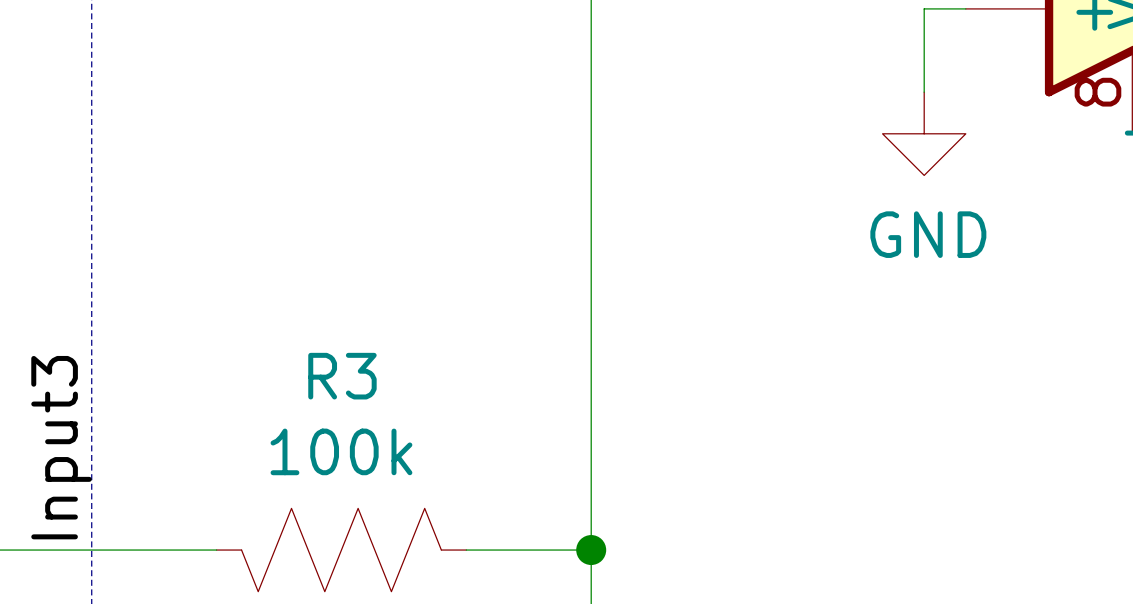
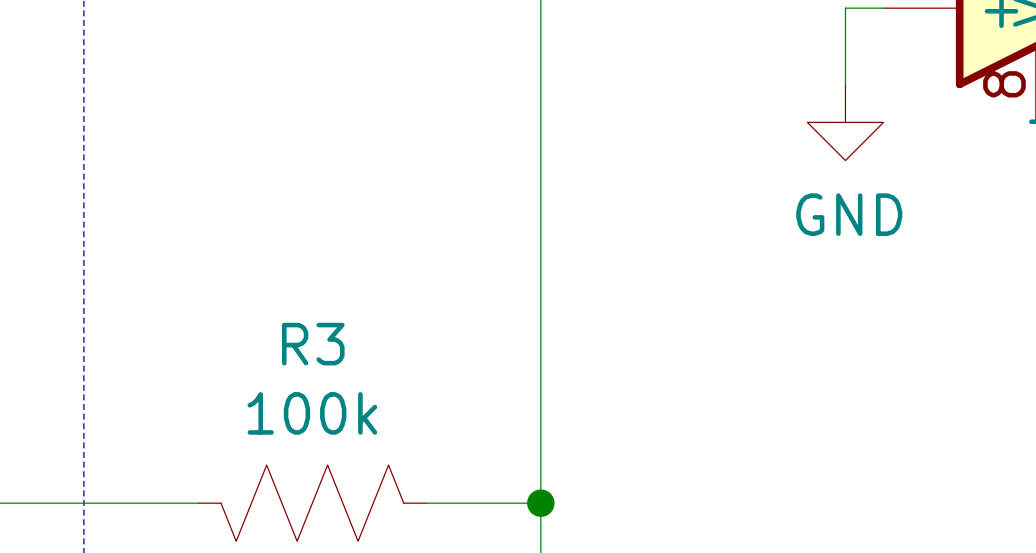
label: Input3 (61, 447) -> none

